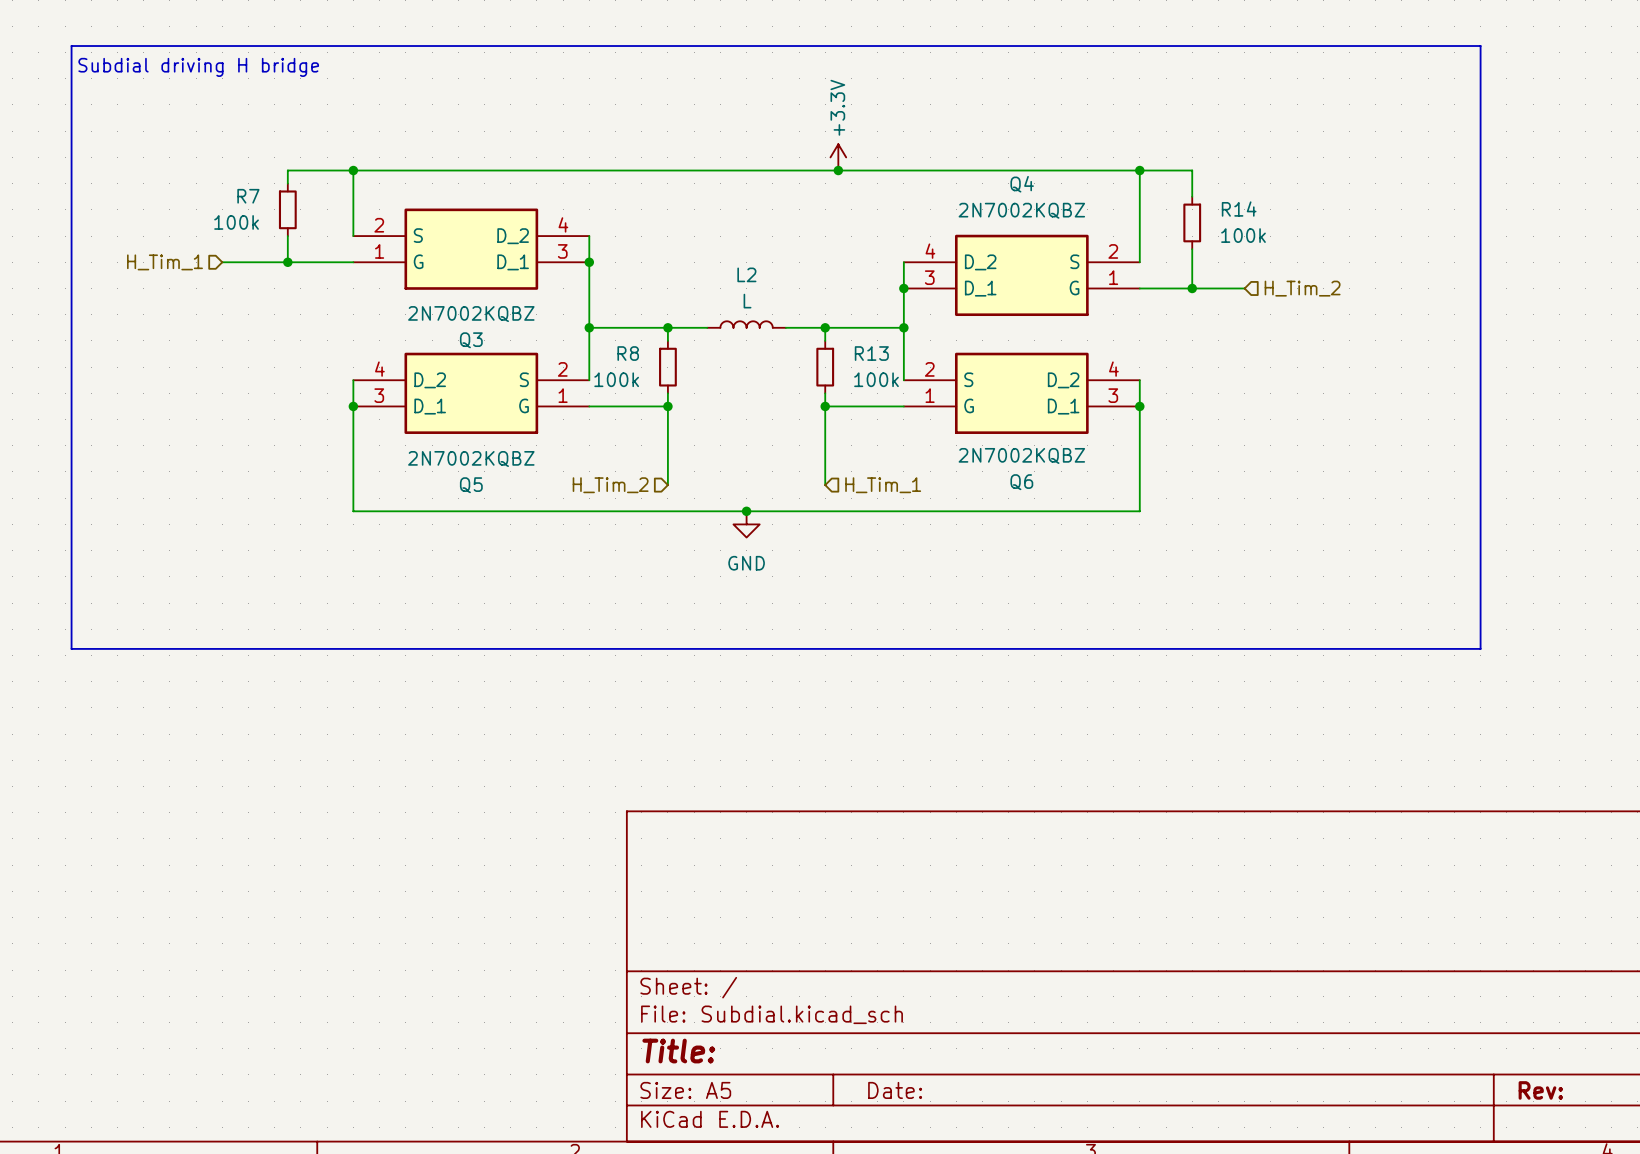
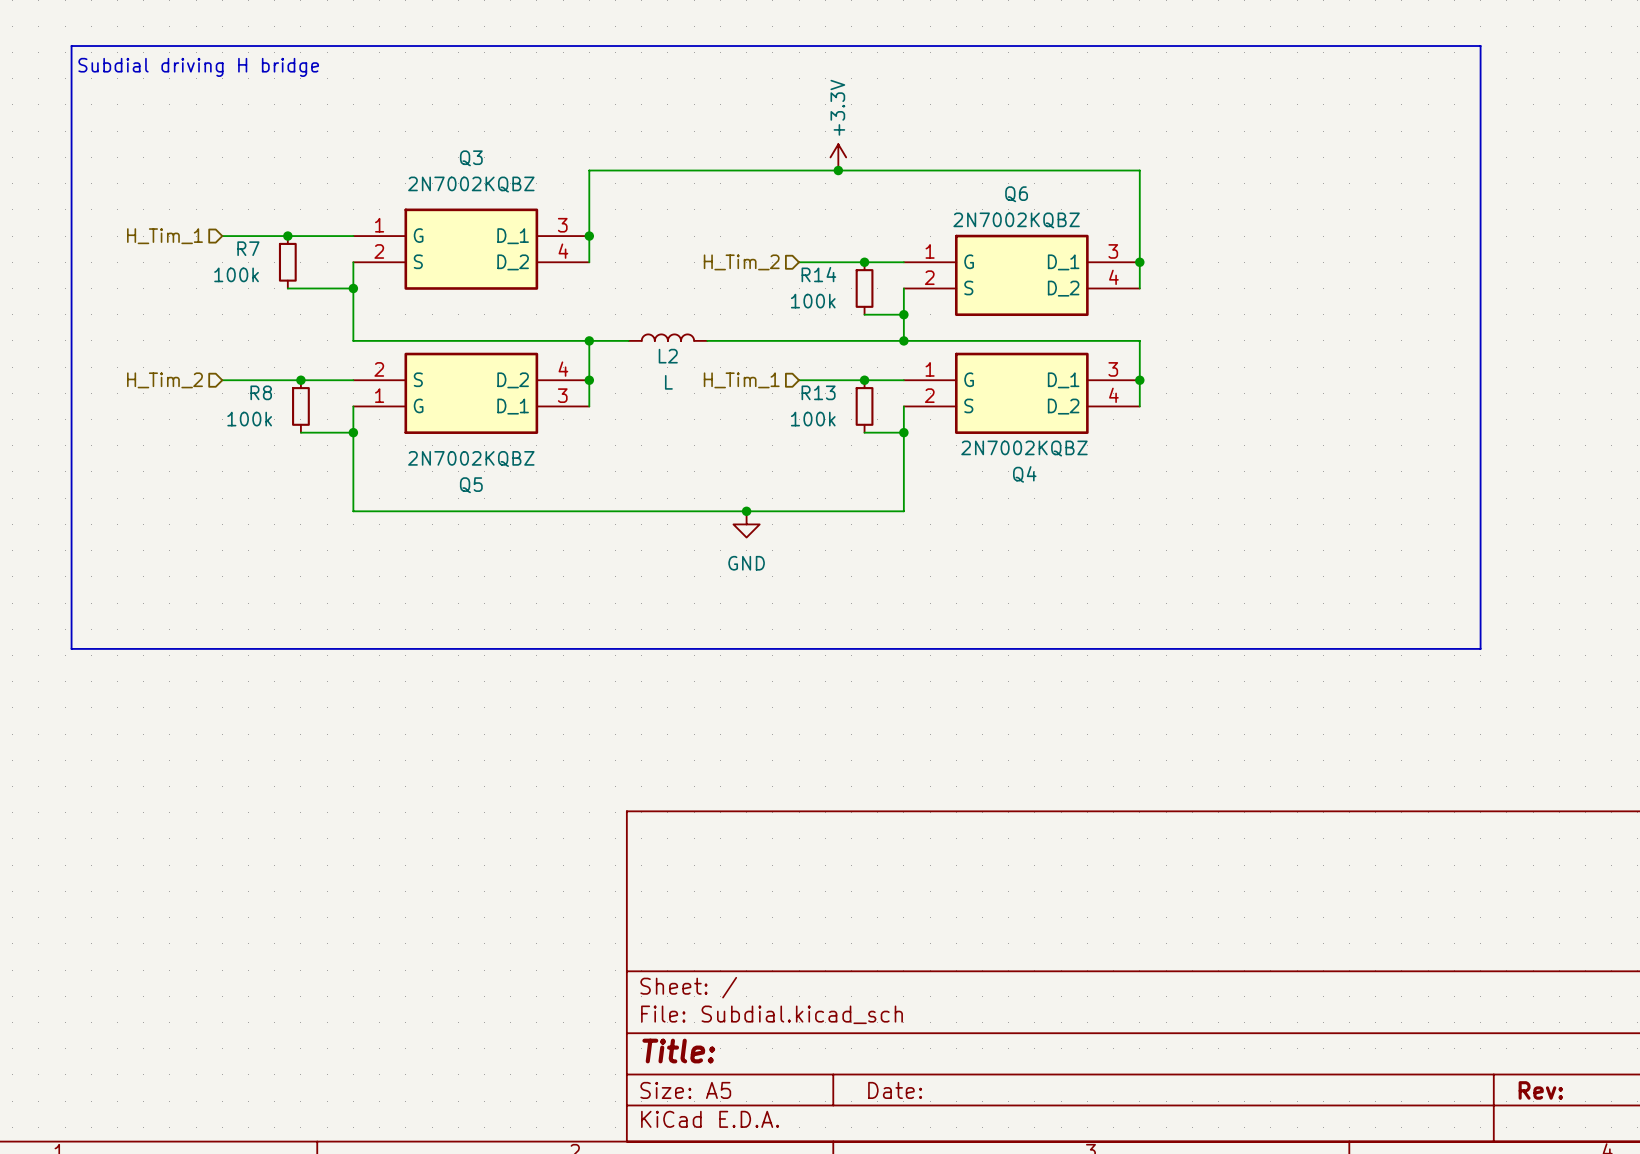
wire: (353, 170) (353, 236) -> (222, 236) (353, 236)
junction: (353, 170) -> none
wire: (589, 170) (287, 170) (287, 183) -> (589, 170) (589, 236)
wire: (1139, 170) (1192, 170) (1192, 196) -> none
junction: (1139, 170) -> none
Q4 name position: Q4 (1022, 184) -> Q4 (1024, 474)
R7 position: (287, 209) -> (287, 262)
R14 name position: R14 (1239, 209) -> R14 (818, 274)
Q4 value position: 2N7002KQBZ (1021, 210) -> 2N7002KQBZ (1024, 448)
R14 position: (1192, 222) -> (864, 288)
R14 value position: 100k (1243, 235) -> 100k (813, 301)
wire: (287, 236) (287, 262) -> none
Q3 flip: as is (471, 249) -> up-down (471, 249)
wire: (1192, 249) (1192, 288) -> none
hierarchical label position: H_Tim_1 (164, 262) -> H_Tim_1 (164, 236)
wire: (222, 262) (353, 262) -> (628, 340) (353, 340) (353, 262)
junction position: (287, 262) -> (287, 236)
wire: (589, 262) (589, 340) -> none
junction position: (589, 262) -> (589, 236)
hierarchical label: none -> H_Tim_2 (741, 262)
junction: none -> (864, 262)
wire: (903, 262) (903, 288) -> (903, 262) (799, 262)
junction: none -> (1139, 262)
L2 name position: L2 (746, 274) -> L2 (668, 356)
Q4 rotation: 0° (1021, 275) -> 180° (1021, 275)
wire: none -> (287, 288) (353, 288)
junction: none -> (353, 288)
junction: (903, 288) -> none
wire: (1139, 288) (1244, 288) -> (1139, 288) (1139, 262)
junction: (1192, 288) -> none
hierarchical label: H_Tim_2 (1302, 288) -> none
L2 value position: L (747, 301) -> L (668, 382)
wire: none -> (864, 314) (903, 314)
junction: none -> (903, 314)
L2 position: (746, 324) -> (667, 337)
wire: (589, 327) (707, 327) -> none
junction position: (589, 327) -> (589, 340)
wire: (667, 327) (667, 340) -> none
junction: (667, 327) -> none
wire: (785, 327) (903, 327) -> none
wire: (825, 327) (825, 340) -> none
junction: (825, 327) -> none
junction: (903, 327) -> none
wire: none -> (707, 340) (1139, 340) (1139, 380)
wire: (903, 340) (903, 380) -> (799, 380) (903, 380)
junction: none -> (903, 340)
R13 name position: R13 (871, 353) -> R13 (818, 392)
R8 position: (667, 367) -> (300, 406)
R13 position: (825, 367) -> (864, 406)
R13 value position: 100k (876, 379) -> 100k (813, 419)
hierarchical label: none -> H_Tim_2 (164, 380)
junction: none -> (300, 380)
wire: (353, 380) (353, 406) -> (353, 380) (222, 380)
junction: none -> (589, 380)
junction: none -> (864, 380)
Q5 flip: as is (471, 393) -> left-right (471, 393)
wire: (667, 393) (667, 485) -> none
wire: (825, 393) (825, 485) -> none
Q6 flip: as is (1021, 393) -> up-down (1021, 393)
junction position: (353, 406) -> (353, 432)
wire: (589, 406) (667, 406) -> (589, 406) (589, 380)
junction: (667, 406) -> none
wire: (825, 406) (903, 406) -> (903, 511) (903, 406)
junction: (825, 406) -> none
wire: (1139, 406) (1139, 511) (903, 511) -> none
junction position: (1139, 406) -> (1139, 380)
wire: none -> (300, 432) (353, 432)
wire: none -> (864, 432) (903, 432)
junction: none -> (903, 432)
Q6 value position: 2N7002KQBZ (1021, 455) -> 2N7002KQBZ (1016, 220)
Q6 name position: Q6 (1021, 482) -> Q6 (1016, 194)
hierarchical label: H_Tim_2 (610, 485) -> none
hierarchical label rotation: 0° (883, 485) -> 180° (741, 380)
hierarchical label position: H_Tim_1 (883, 485) -> H_Tim_1 (741, 380)

